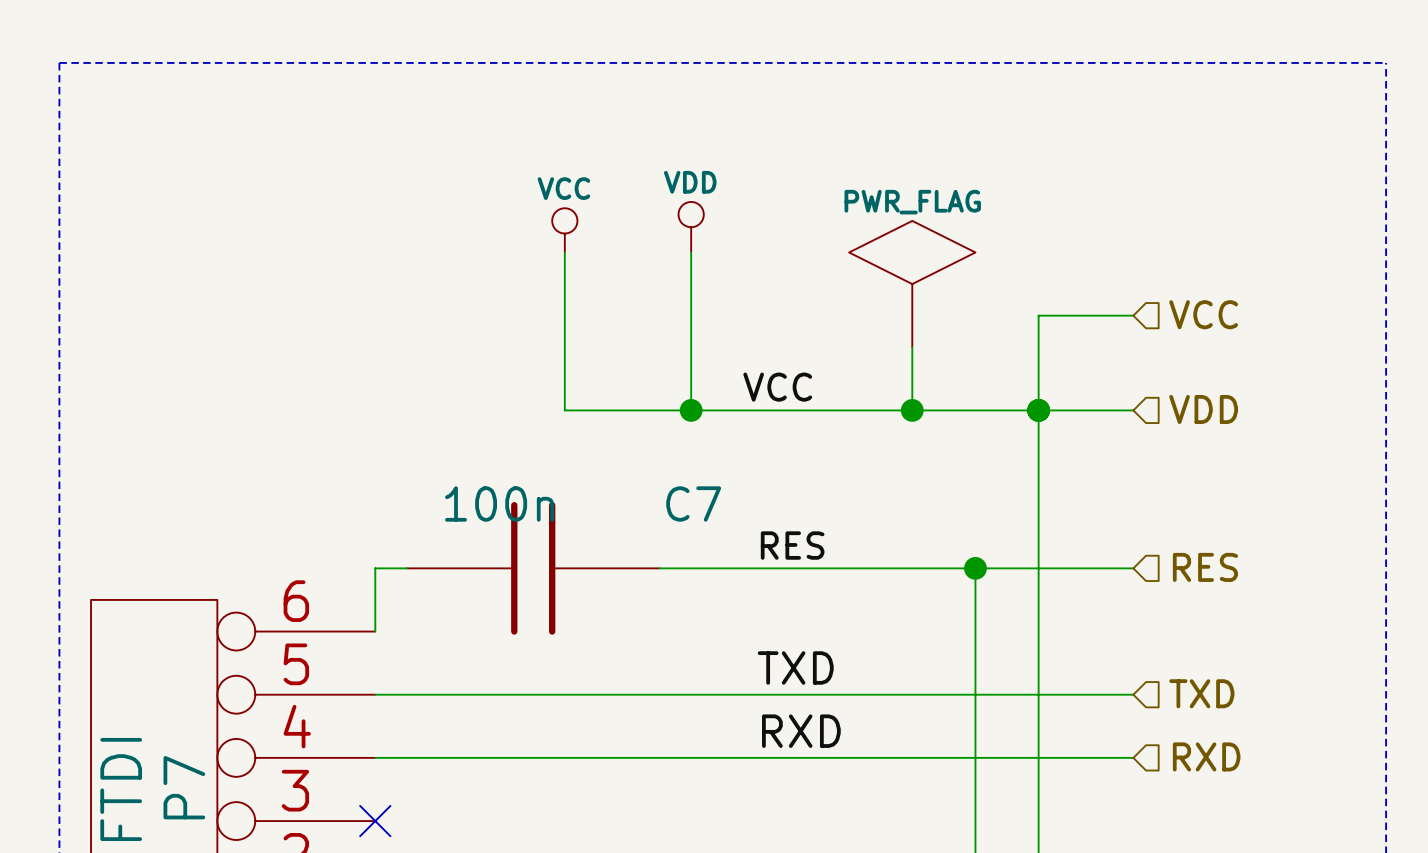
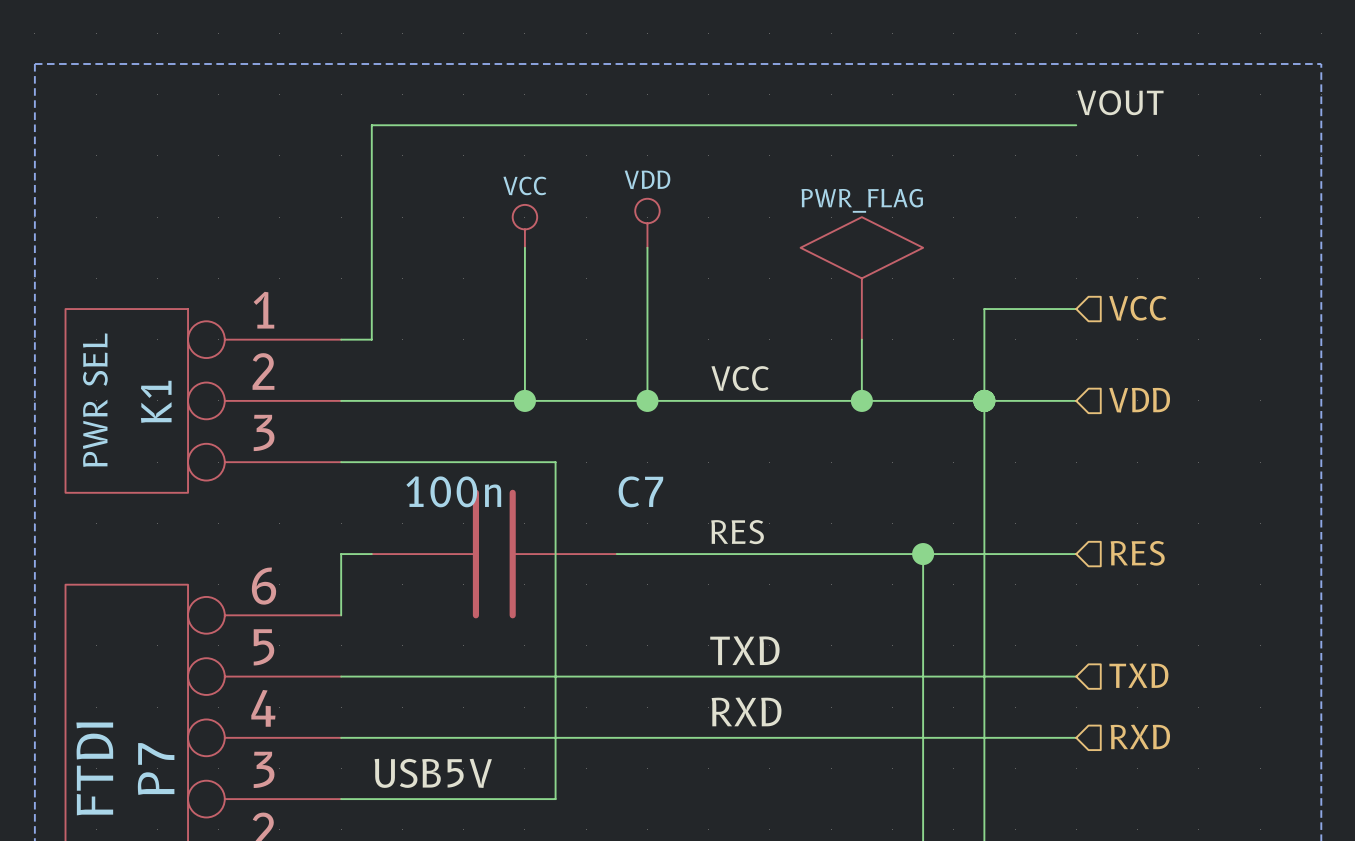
label: none -> VOUT (1120, 102)
wire: none -> (1076, 125) (371, 125) (371, 339) (341, 339)
K1: none -> PWR SEL (203, 400)
wire: none -> (341, 400) (524, 400)
junction: none -> (524, 400)
wire: none -> (341, 462) (555, 462) (555, 799) (341, 799)
label: none -> USB5V (433, 773)
no-connect mark: (375, 821) -> none

